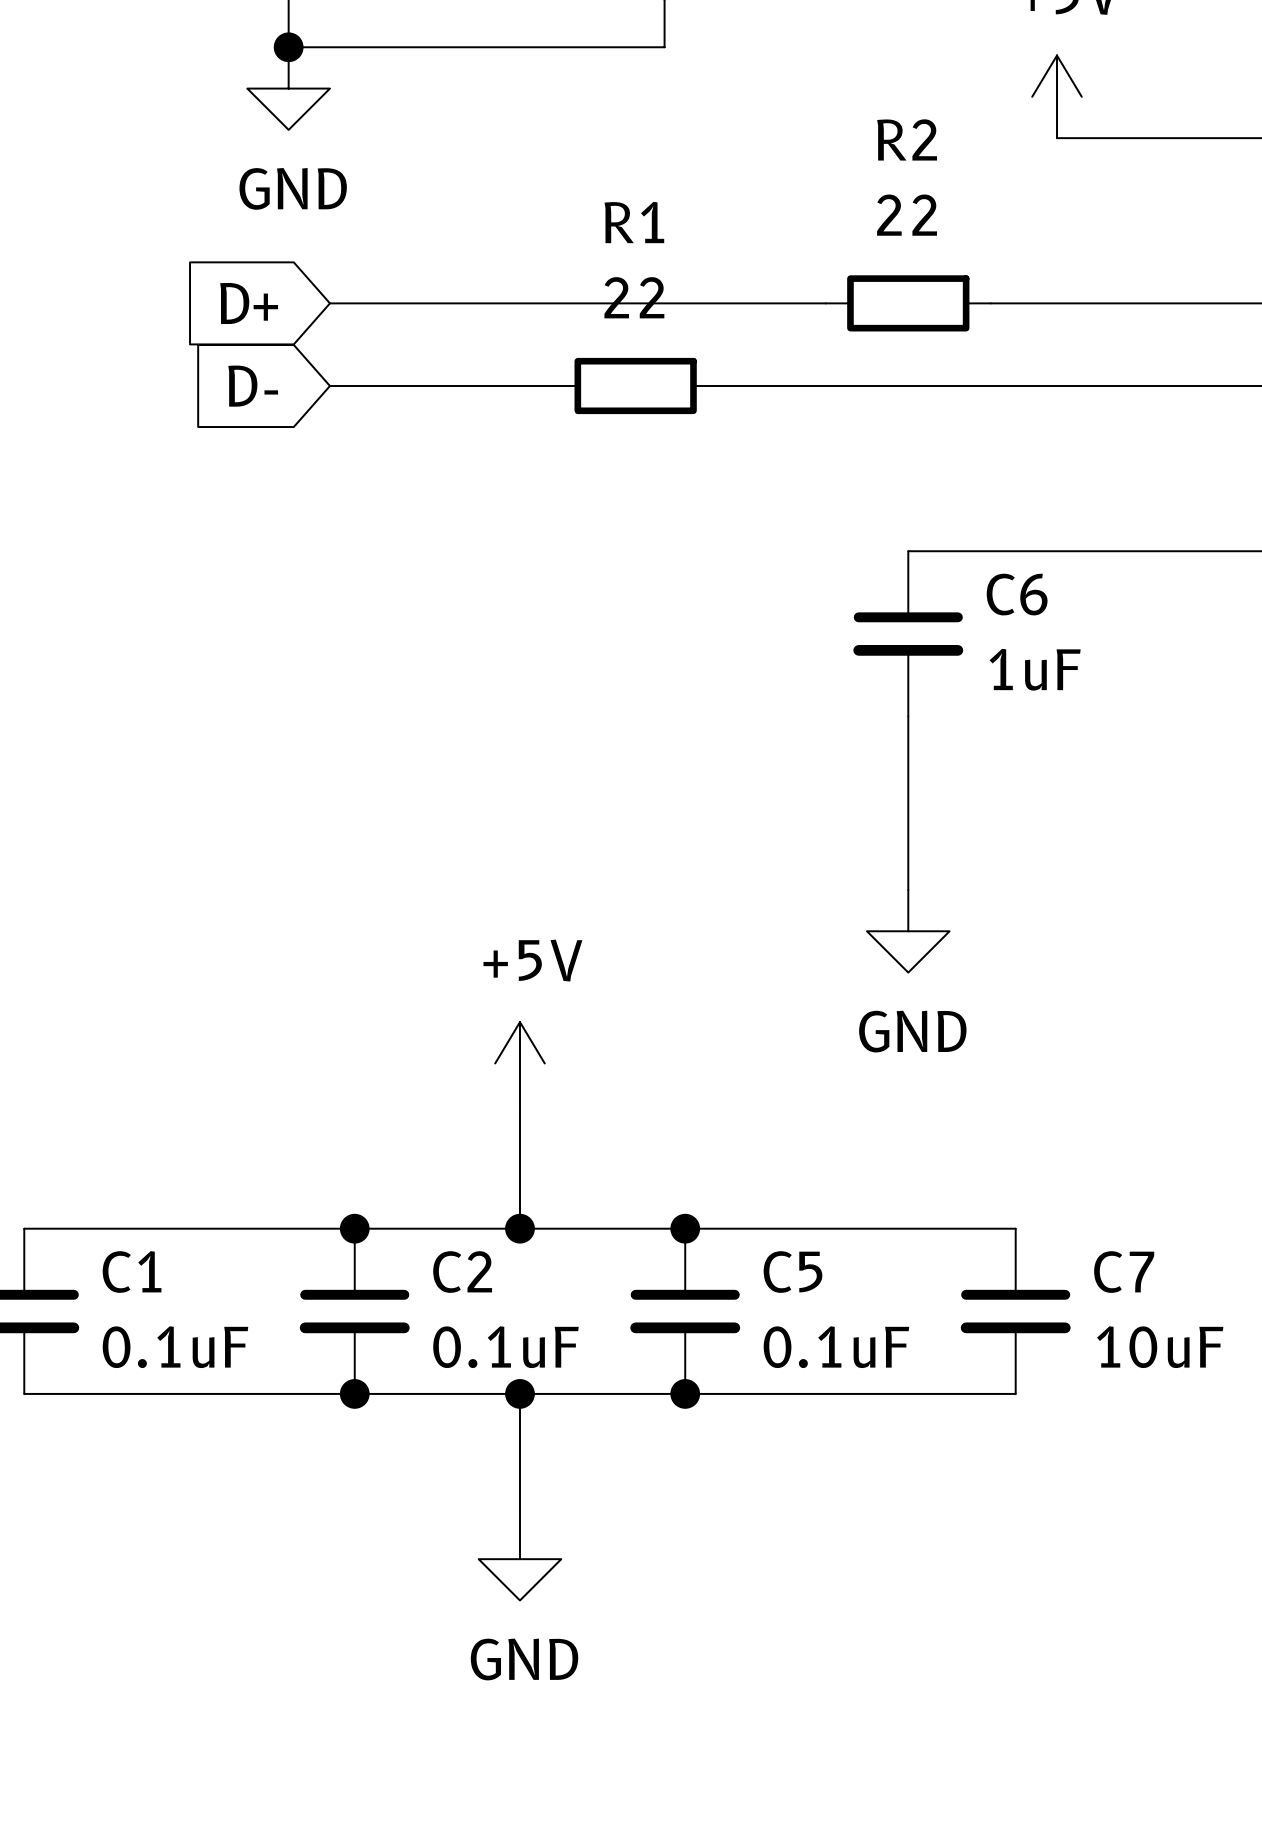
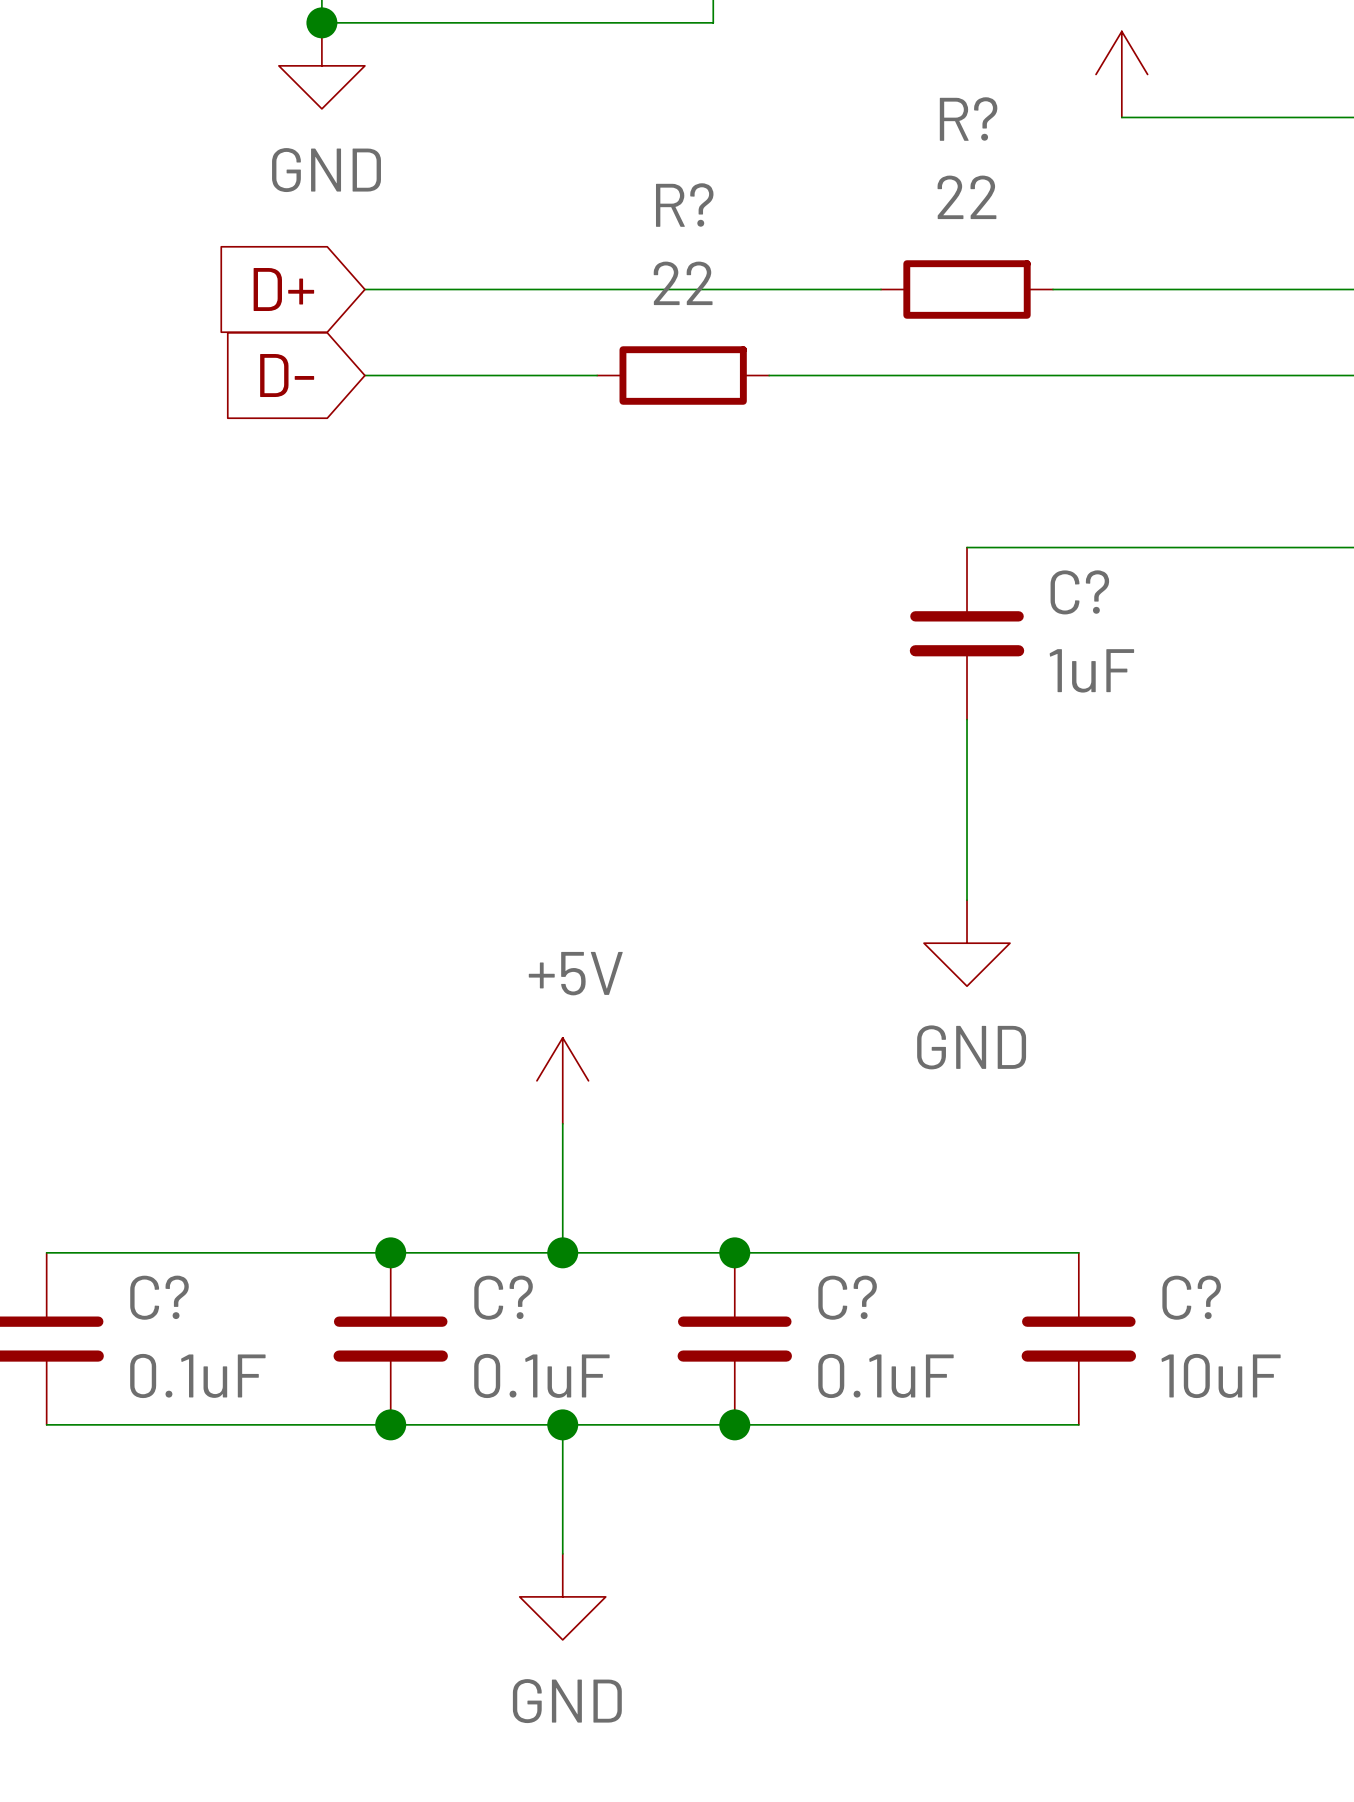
R2 name: R2 (907, 139) -> R? (968, 119)
R1 name: R1 (634, 222) -> R? (684, 205)
C6 name: C6 (1017, 594) -> C? (1079, 592)
C1 name: C1 (132, 1272) -> C? (159, 1297)
C2 name: C2 (462, 1272) -> C? (503, 1297)
C5 name: C5 (793, 1272) -> C? (847, 1297)
C7 name: C7 (1124, 1272) -> C? (1191, 1297)

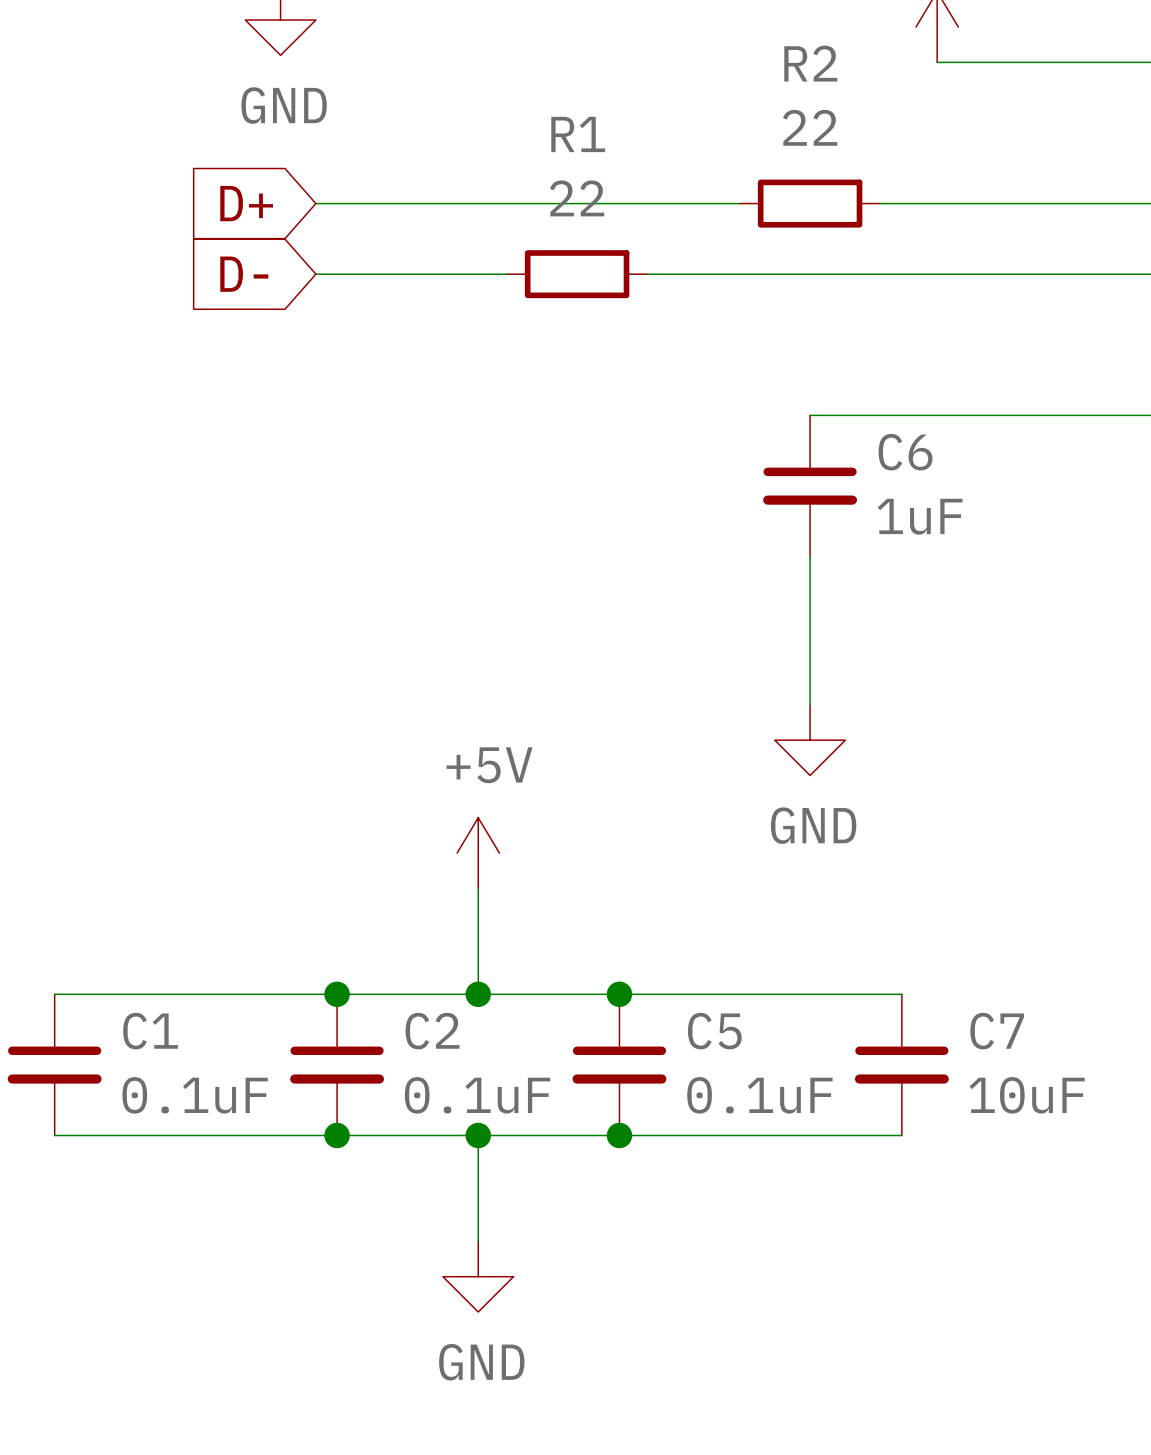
R? name: R? (968, 119) -> R2 (810, 63)
R? name: R? (684, 205) -> R1 (578, 134)
C? name: C? (1079, 592) -> C6 (905, 452)
C? name: C? (159, 1297) -> C1 (150, 1031)
C? name: C? (503, 1297) -> C2 (432, 1031)
C? name: C? (847, 1297) -> C5 (714, 1031)
C? name: C? (1191, 1297) -> C7 (997, 1031)

